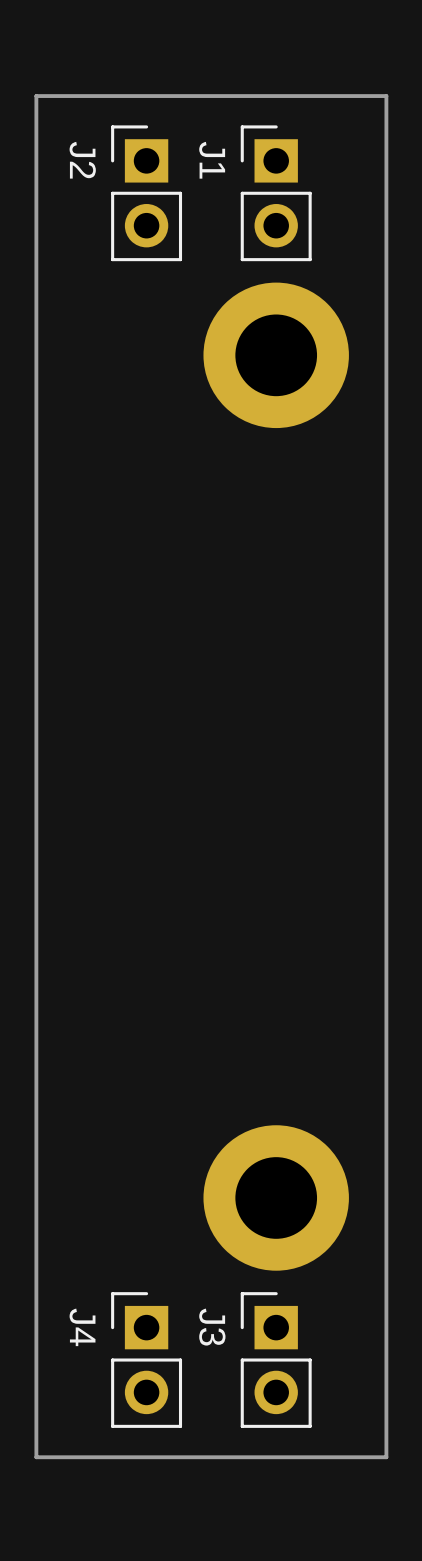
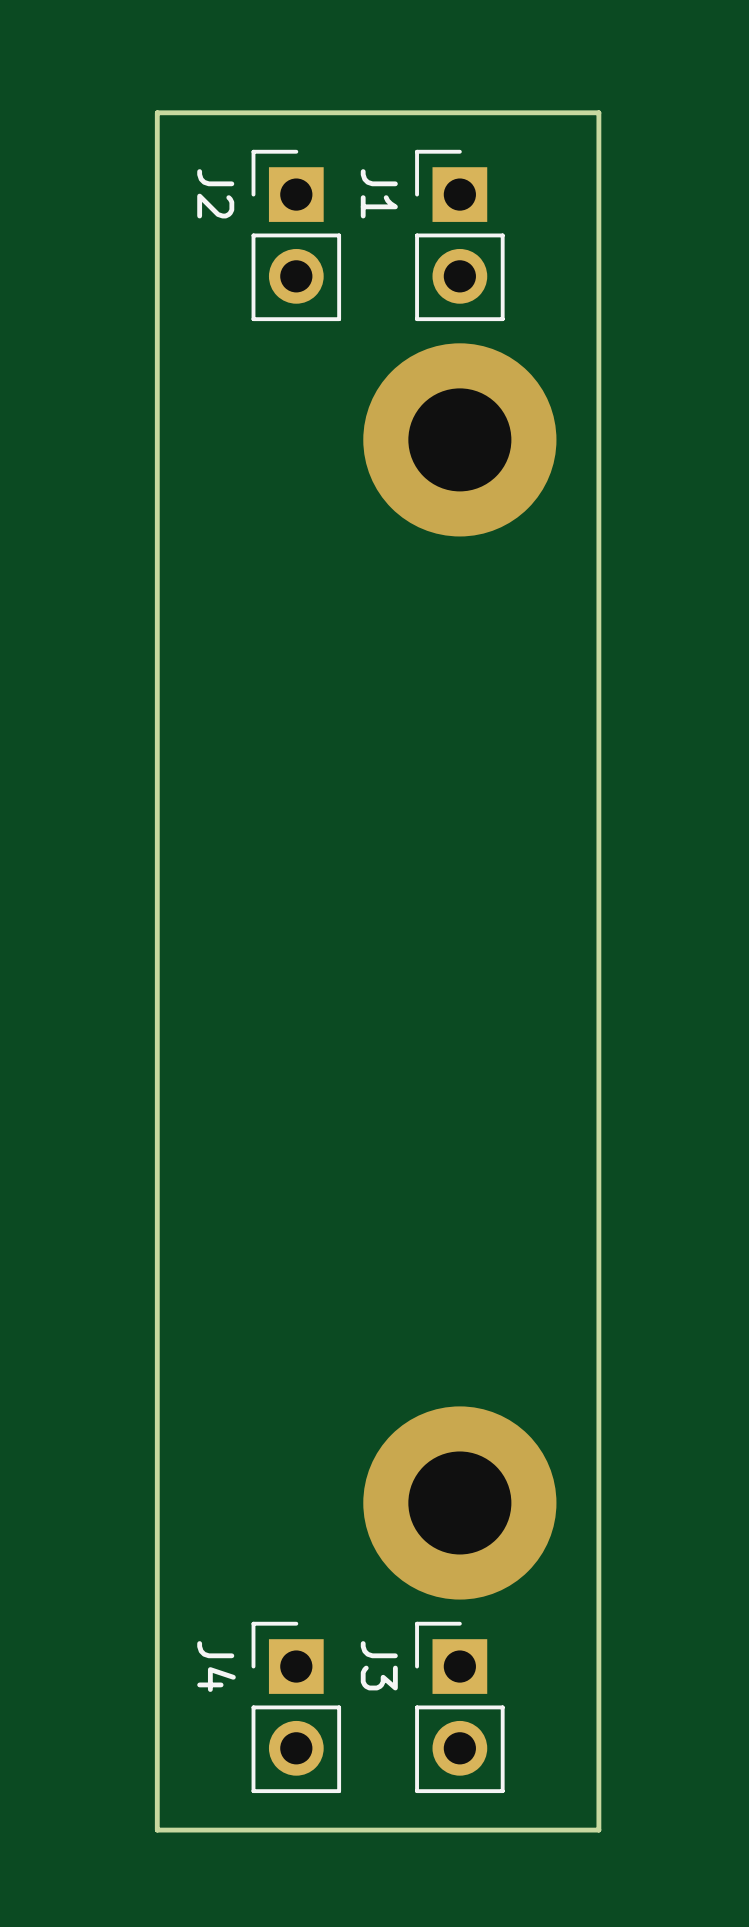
part: (276, 355) -> none
via: none -> (459, 439)
part: (276, 1197) -> none
via: none -> (459, 1502)

